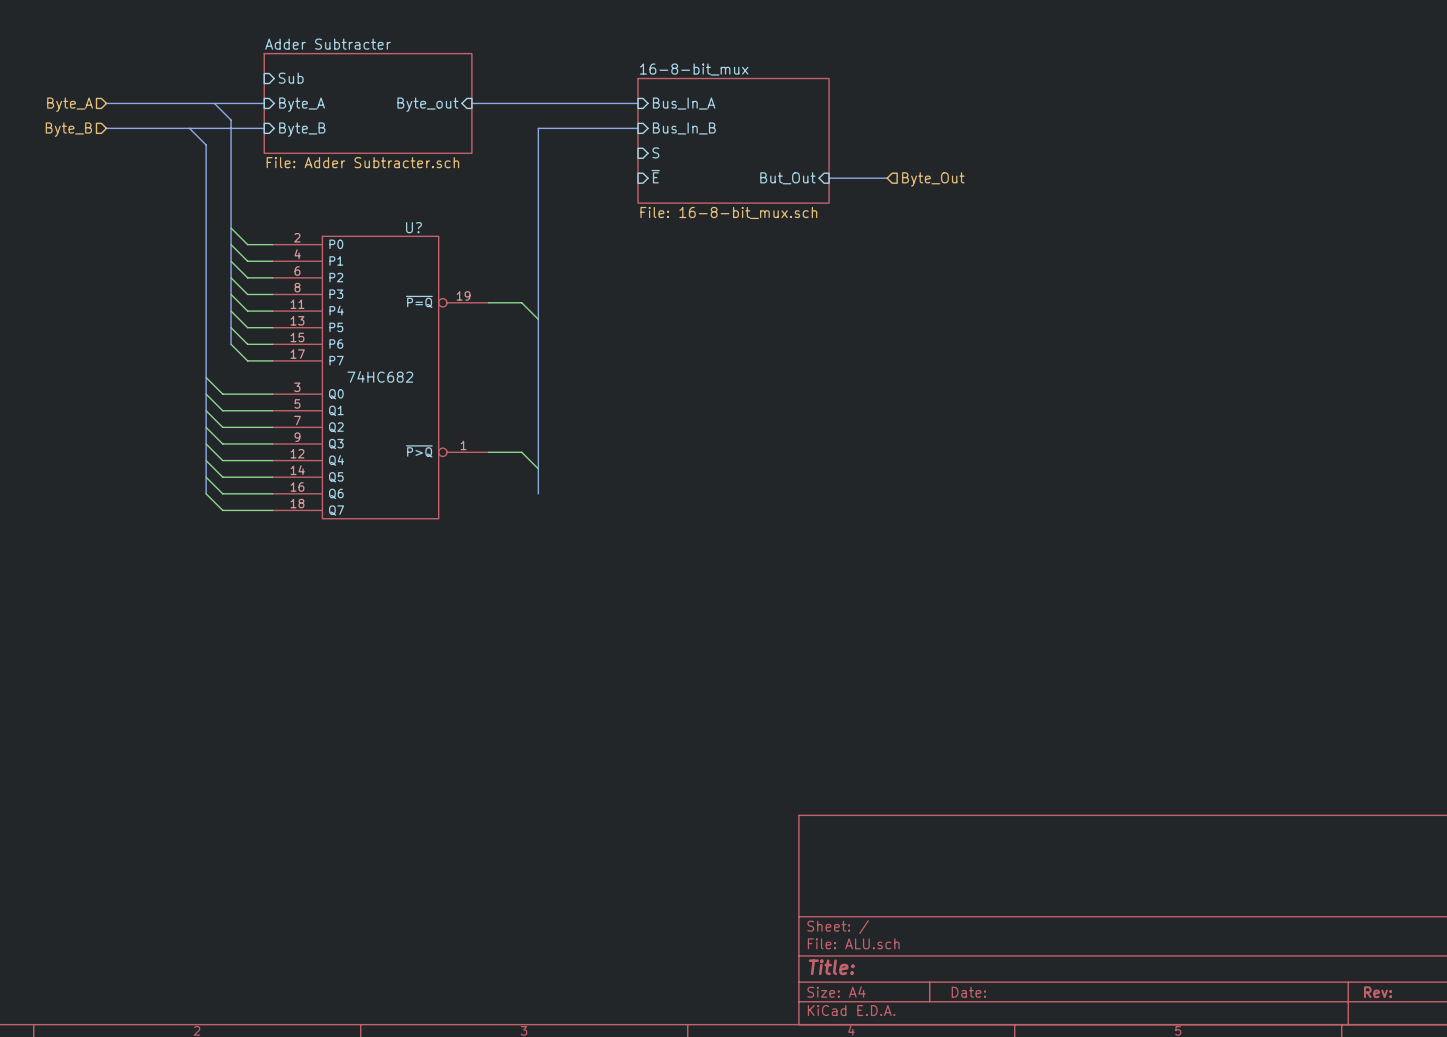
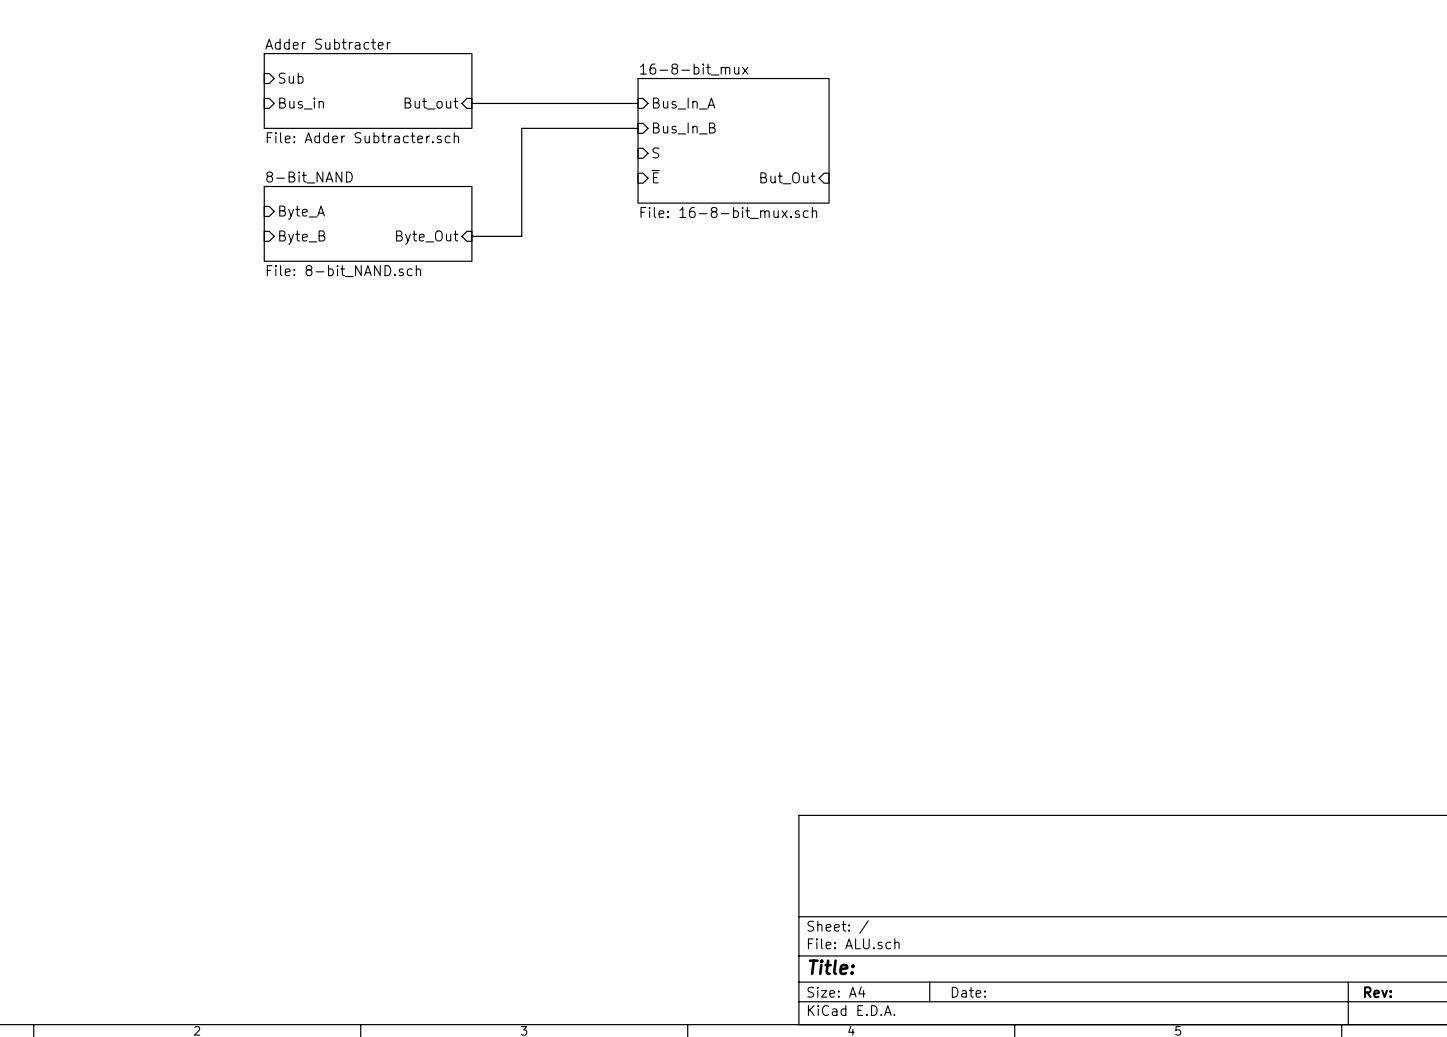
sheet Adder Subtracter: none -> File: Adder Subtracter.sch (368, 90)
bus: (106, 103) (264, 103) -> none
bus: (214, 103) (231, 120) (231, 344) -> none
sheet Adder Subtracter: File: Adder Subtracter.sch (368, 103) -> none
hierarchical label: Byte_A (70, 104) -> none
sheet pin: Byte_A (302, 104) -> Bus_in (301, 103)
sheet pin: Byte_out (427, 104) -> But_out (431, 103)
bus: (106, 128) (264, 128) -> none
bus: (189, 128) (206, 144) (206, 493) -> none
bus: (538, 128) (538, 493) -> (538, 128) (521, 128) (521, 236) (471, 236)
hierarchical label: Byte_B (68, 129) -> none
sheet pin position: Byte_B (302, 129) -> Byte_B (302, 237)
bus: (829, 178) (887, 178) -> none
hierarchical label: Byte_Out (933, 179) -> none
sheet pin: none -> Byte_A (302, 212)
sheet 8-Bit_NAND: none -> File: 8-bit_NAND.sch (368, 223)
wire: (231, 228) (247, 244) (272, 244) -> none
sheet pin: none -> Byte_Out (427, 237)
wire: (231, 244) (247, 261) (272, 261) -> none
wire: (231, 261) (247, 277) (272, 277) -> none
wire: (231, 277) (247, 294) (272, 294) -> none
wire: (231, 294) (247, 311) (272, 311) -> none
wire: (488, 302) (521, 302) (538, 319) -> none
wire: (231, 311) (247, 327) (272, 327) -> none
wire: (231, 327) (247, 344) (272, 344) -> none
wire: (231, 344) (247, 360) (272, 360) -> none
wire: (206, 377) (222, 394) (272, 394) -> none
U?: 74HC682 (380, 377) -> none
wire: (206, 394) (222, 410) (272, 410) -> none
wire: (206, 410) (222, 427) (272, 427) -> none
wire: (206, 427) (222, 443) (272, 443) -> none
wire: (206, 443) (222, 460) (272, 460) -> none
wire: (488, 452) (521, 452) (538, 468) -> none
wire: (206, 460) (222, 477) (272, 477) -> none
wire: (206, 477) (222, 493) (272, 493) -> none
wire: (206, 493) (222, 510) (272, 510) -> none

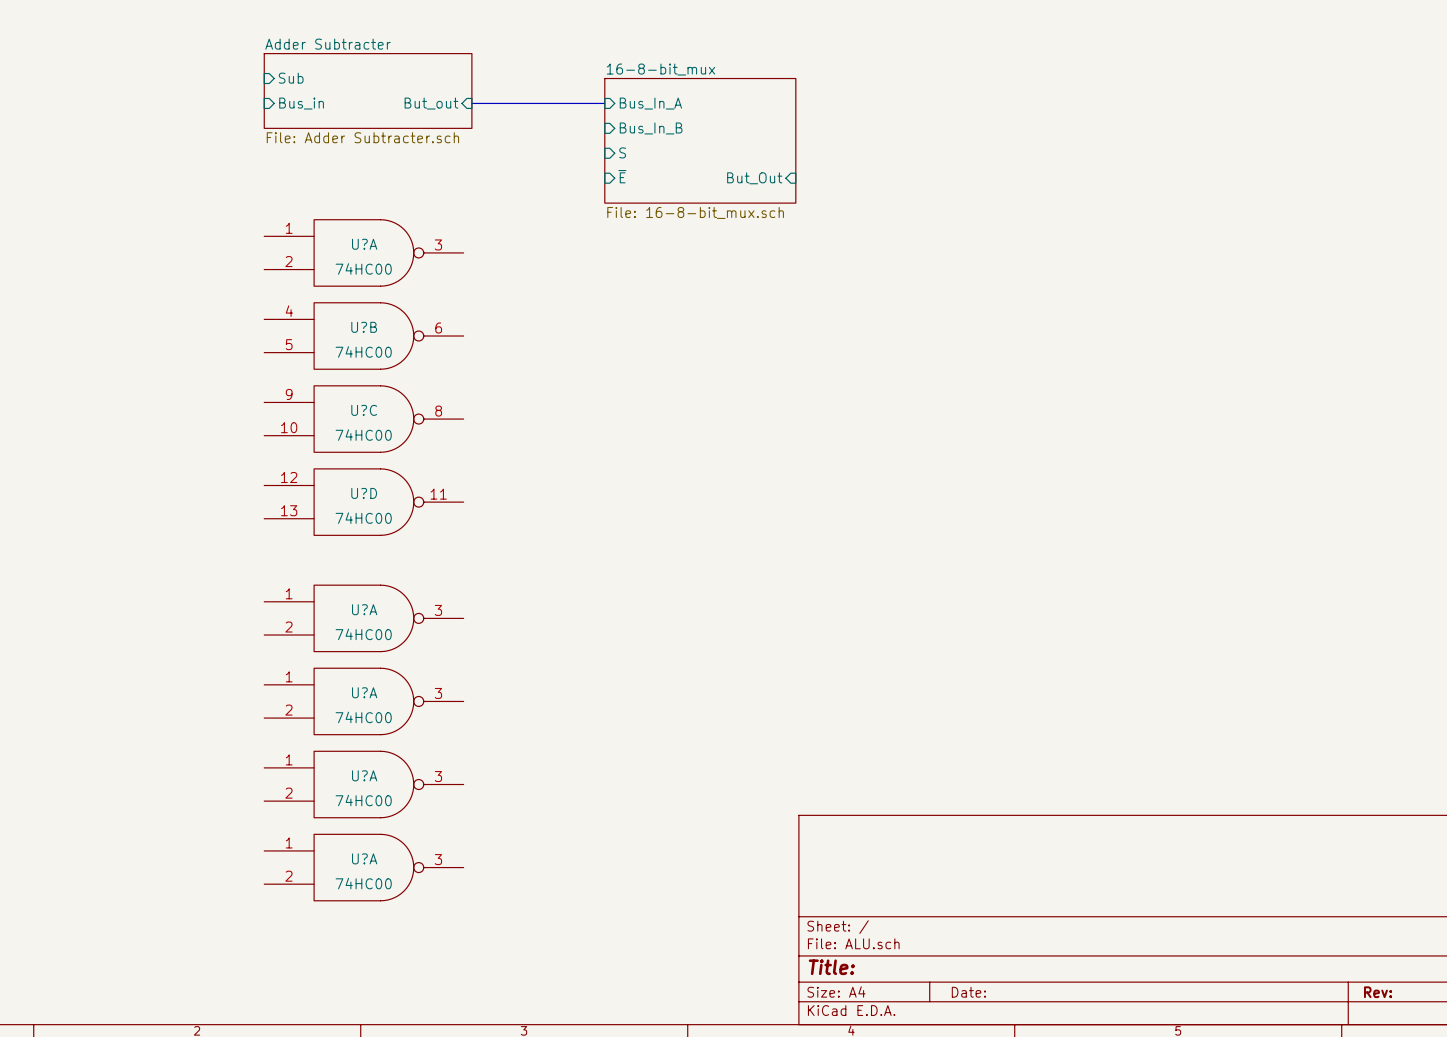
bus: (604, 103) (638, 103) -> none
sheet pin position: Bus_In_A (684, 103) -> Bus_In_A (650, 103)
bus: (638, 128) (521, 128) (521, 236) (471, 236) -> none
sheet pin position: Bus_In_B (684, 128) -> Bus_In_B (651, 128)
sheet 16-8-bit_mux position: (733, 140) -> (700, 140)
sheet pin position: S (655, 152) -> S (622, 152)
sheet pin position: ~{E} (655, 176) -> ~{E} (622, 176)
sheet pin position: But_Out (787, 178) -> But_Out (754, 178)
sheet pin: Byte_A (302, 212) -> none
sheet 8-Bit_NAND: File: 8-bit_NAND.sch (368, 223) -> none
sheet pin: Byte_B (302, 237) -> none
sheet pin: Byte_Out (427, 237) -> none
U?A: none -> 74HC00 (363, 252)
U?B: none -> 74HC00 (363, 336)
U?C: none -> 74HC00 (363, 419)
U?D: none -> 74HC00 (363, 502)
U?A: none -> 74HC00 (363, 618)
U?A: none -> 74HC00 (363, 701)
U?A: none -> 74HC00 (363, 784)
U?A: none -> 74HC00 (363, 867)

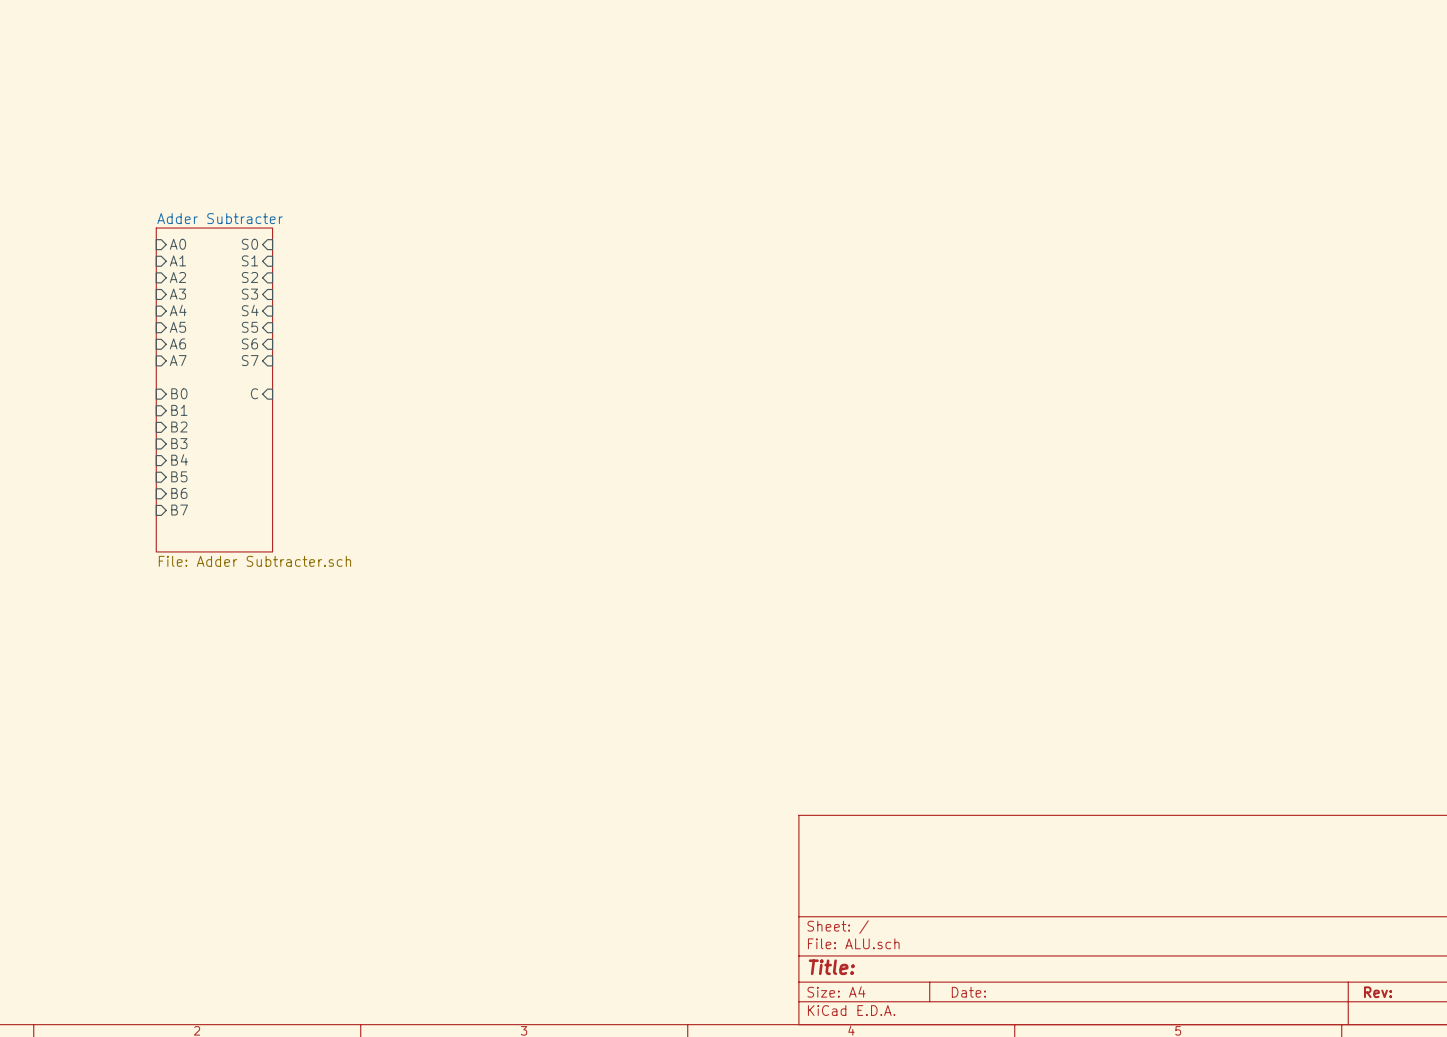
sheet pin: Sub (291, 78) -> none
sheet Adder Subtracter: File: Adder Subtracter.sch (368, 90) -> none
sheet pin: Bus_in (301, 103) -> none
sheet pin: But_out (431, 103) -> none
bus: (471, 103) (604, 103) -> none
sheet pin: Bus_In_A (650, 103) -> none
sheet pin: Bus_In_B (651, 128) -> none
sheet 16-8-bit_mux: File: 16-8-bit_mux.sch (700, 140) -> none
sheet pin: S (622, 152) -> none
sheet pin: ~{E} (622, 176) -> none
sheet pin: But_Out (754, 178) -> none
sheet pin: none -> A0 (177, 244)
sheet pin: none -> S0 (249, 244)
U?A: 74HC00 (363, 252) -> none
sheet pin: none -> A1 (177, 260)
sheet pin: none -> S1 (249, 260)
sheet pin: none -> A2 (177, 277)
sheet pin: none -> S2 (249, 277)
sheet pin: none -> A3 (177, 294)
sheet pin: none -> S3 (249, 294)
sheet pin: none -> A4 (178, 310)
sheet pin: none -> S4 (250, 310)
sheet pin: none -> A5 (177, 327)
sheet pin: none -> S5 (249, 327)
U?B: 74HC00 (363, 336) -> none
sheet pin: none -> A6 (177, 343)
sheet pin: none -> S6 (249, 343)
sheet pin: none -> A7 (178, 360)
sheet pin: none -> S7 (250, 360)
sheet Adder Subtracter: none -> File: Adder Subtracter.sch (214, 389)
sheet pin: none -> B0 (179, 393)
sheet pin: none -> C (254, 393)
sheet pin: none -> B1 (179, 410)
U?C: 74HC00 (363, 419) -> none
sheet pin: none -> B2 (179, 426)
sheet pin: none -> B3 (179, 443)
sheet pin: none -> B4 (179, 459)
sheet pin: none -> B5 (179, 476)
sheet pin: none -> B6 (179, 493)
U?D: 74HC00 (363, 502) -> none
sheet pin: none -> B7 (179, 510)
U?A: 74HC00 (363, 618) -> none
U?A: 74HC00 (363, 701) -> none
U?A: 74HC00 (363, 784) -> none
U?A: 74HC00 (363, 867) -> none

